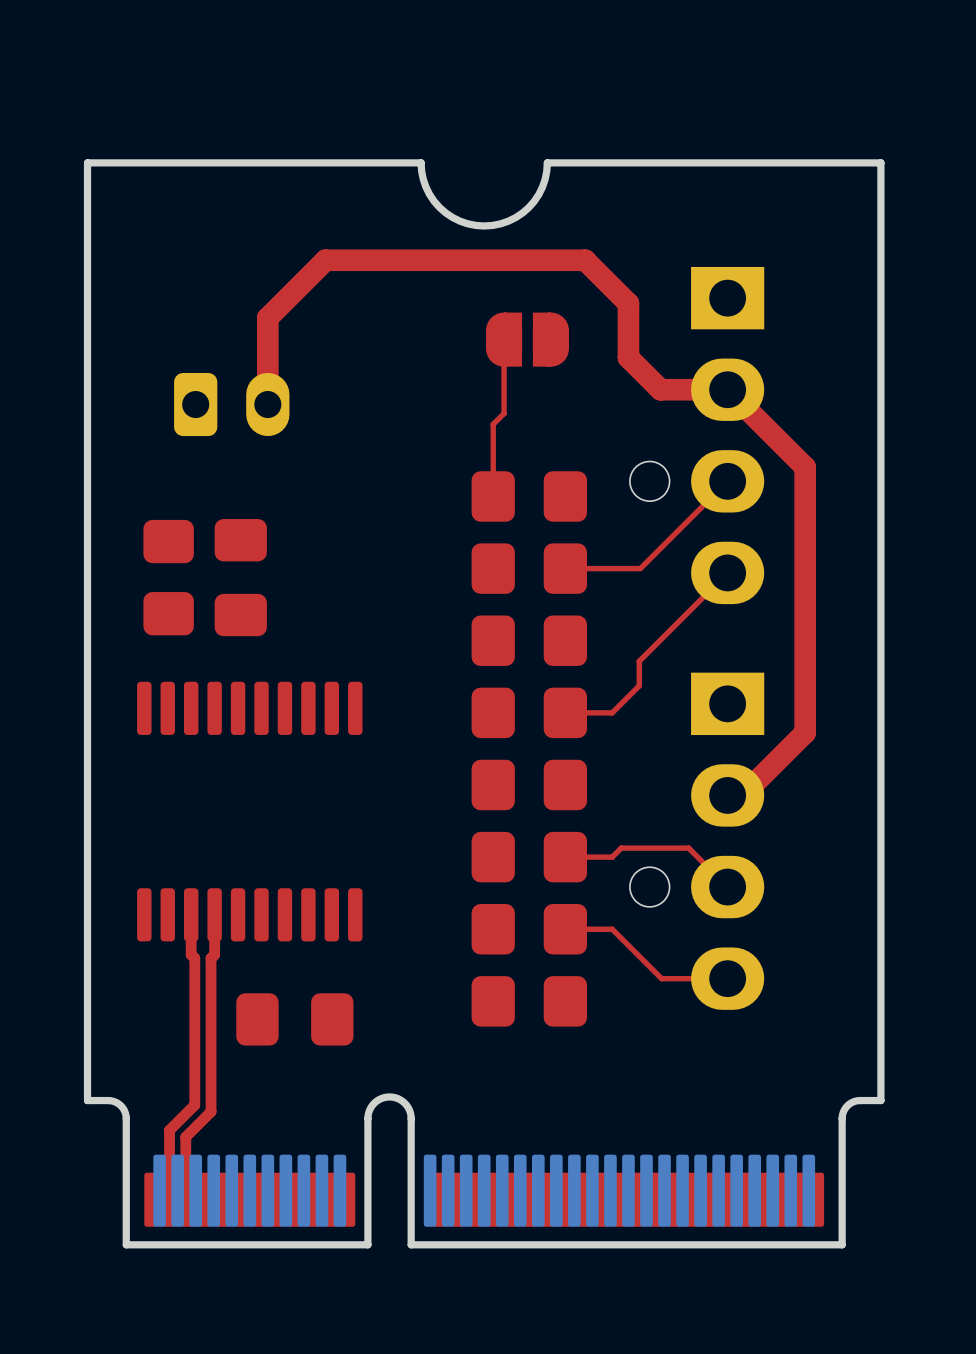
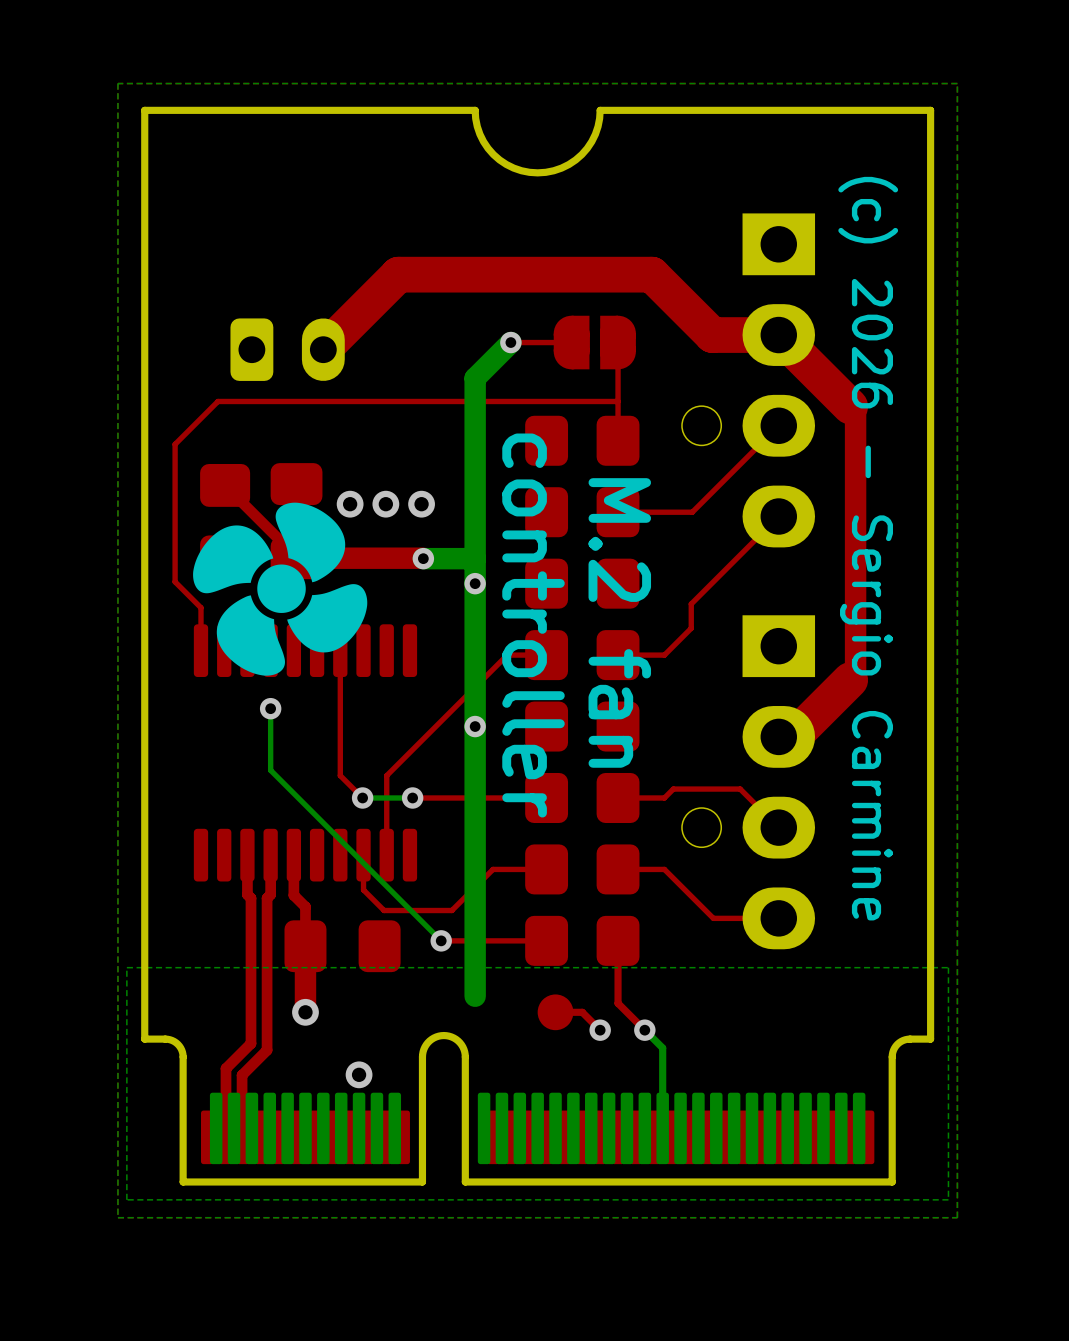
bottom zone outline: none -> (957, 83) (117, 83) (117, 1217) (957, 1217) (957, 83)
top track: (504, 339) (504, 413) (493, 424) (493, 496) -> none
part position: (527, 339) -> (594, 342)
top track: (628, 357) (628, 303) (585, 260) (325, 260) (267, 317) (267, 404) -> (680, 303) (651, 274) (398, 274) (323, 349)
top track width: thin (628, 357) (660, 389) (727, 389) (799, 461) -> thick (680, 303) (712, 335) (778, 335) (850, 406)
bottom track: none -> (510, 342) (475, 378) (475, 996)
via: none -> (510, 342)
top track: none -> (557, 342) (510, 342)
top track: none -> (618, 342) (618, 440)
top track: none -> (618, 401) (217, 401) (175, 444) (175, 581) (200, 607) (200, 650)
top track: none -> (225, 485) (296, 558) (422, 558)
drawing: none -> [193, 502, 368, 676]
via: none -> (350, 504)
via: none -> (385, 504)
via: none -> (421, 504)
text: none -> (c) 2026 - Sergio Carmine (868, 548)
via: none -> (423, 558)
bottom track: none -> (475, 558) (423, 558)
via: none -> (475, 583)
text: none -> M.2 fan (619, 622)
text: none -> controller (533, 625)
top track: none -> (340, 650) (340, 775) (362, 797)
top track: none -> (546, 655) (507, 655) (386, 775) (386, 855)
top track width: thin (799, 738) (742, 795) -> thick (850, 680) (793, 736)
via: none -> (270, 708)
bottom track: none -> (270, 709) (270, 770) (441, 940)
via: none -> (475, 726)
via: none -> (362, 797)
bottom track: none -> (412, 797) (362, 797)
via: none -> (412, 797)
top track: none -> (546, 797) (412, 797)
top track: none -> (293, 855) (293, 895) (305, 906) (305, 1012)
top track: none -> (363, 855) (363, 889) (384, 910) (451, 910) (493, 869) (546, 869)
via: none -> (441, 940)
top track: none -> (546, 940) (441, 940)
top track: none -> (618, 940) (618, 1003) (644, 1030)
part position: (294, 1019) -> (342, 946)
bottom zone outline: none -> (948, 967) (126, 967) (126, 1199) (948, 1199) (948, 967)
via: none -> (305, 1012)
top track: none -> (555, 1012) (582, 1012) (600, 1030)
part: none -> (555, 1012)
via: none -> (600, 1030)
bottom track: none -> (644, 1030) (662, 1048) (662, 1128)
via: none -> (644, 1030)
via: none -> (359, 1074)

